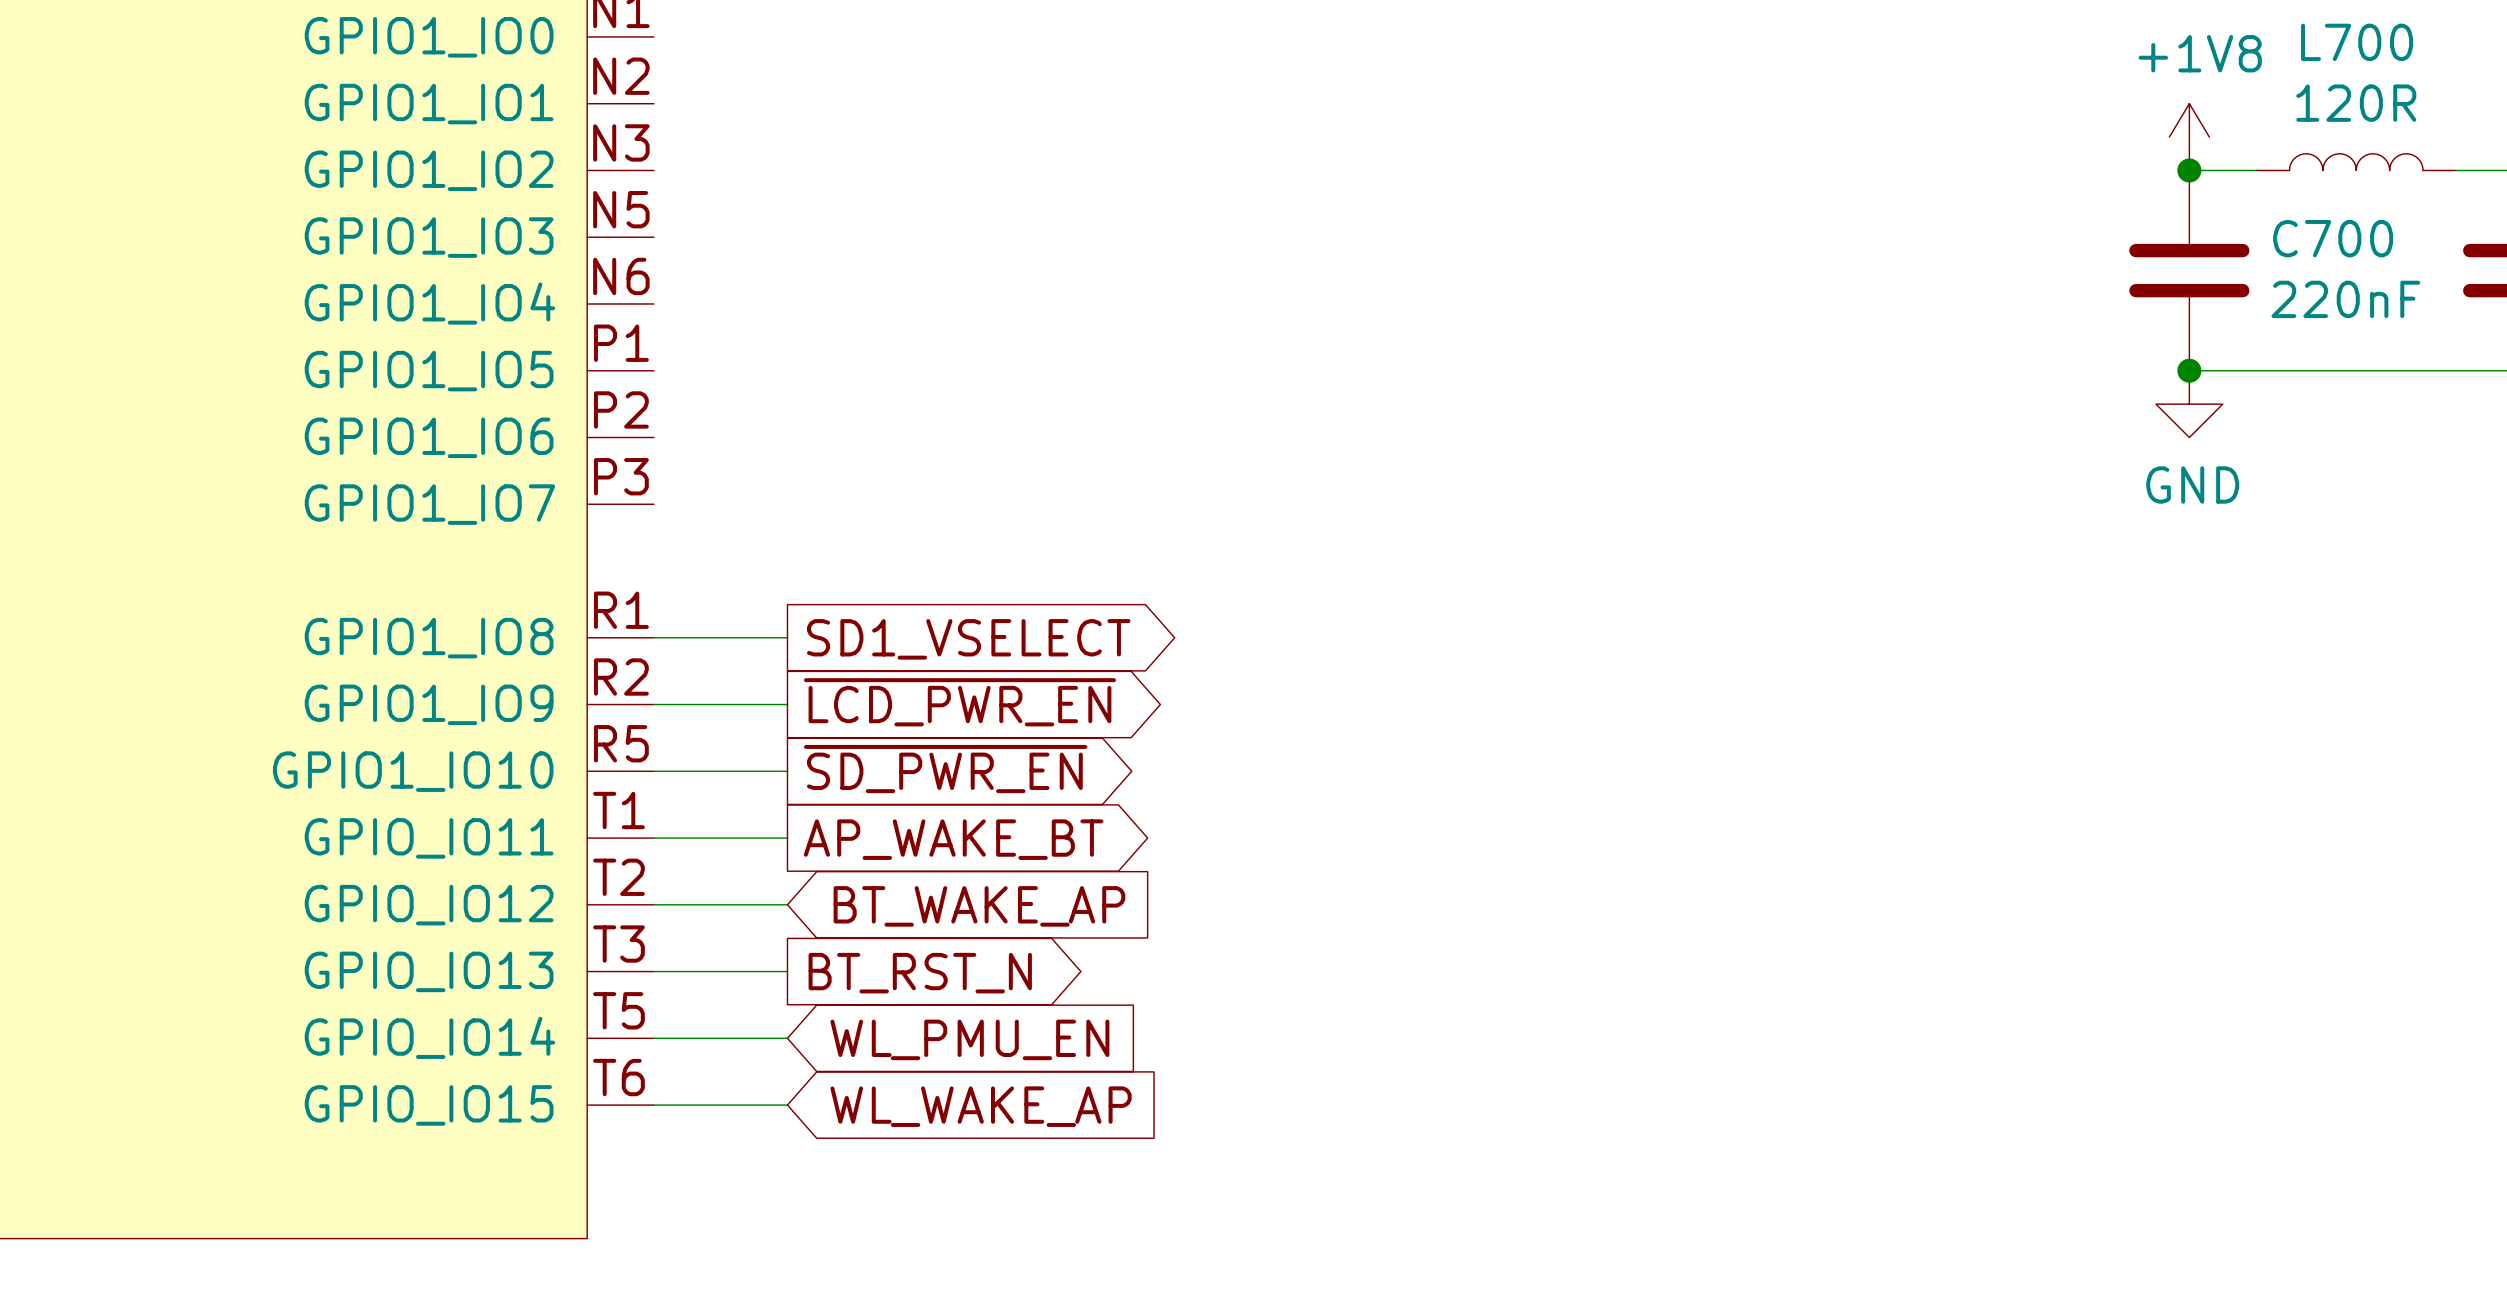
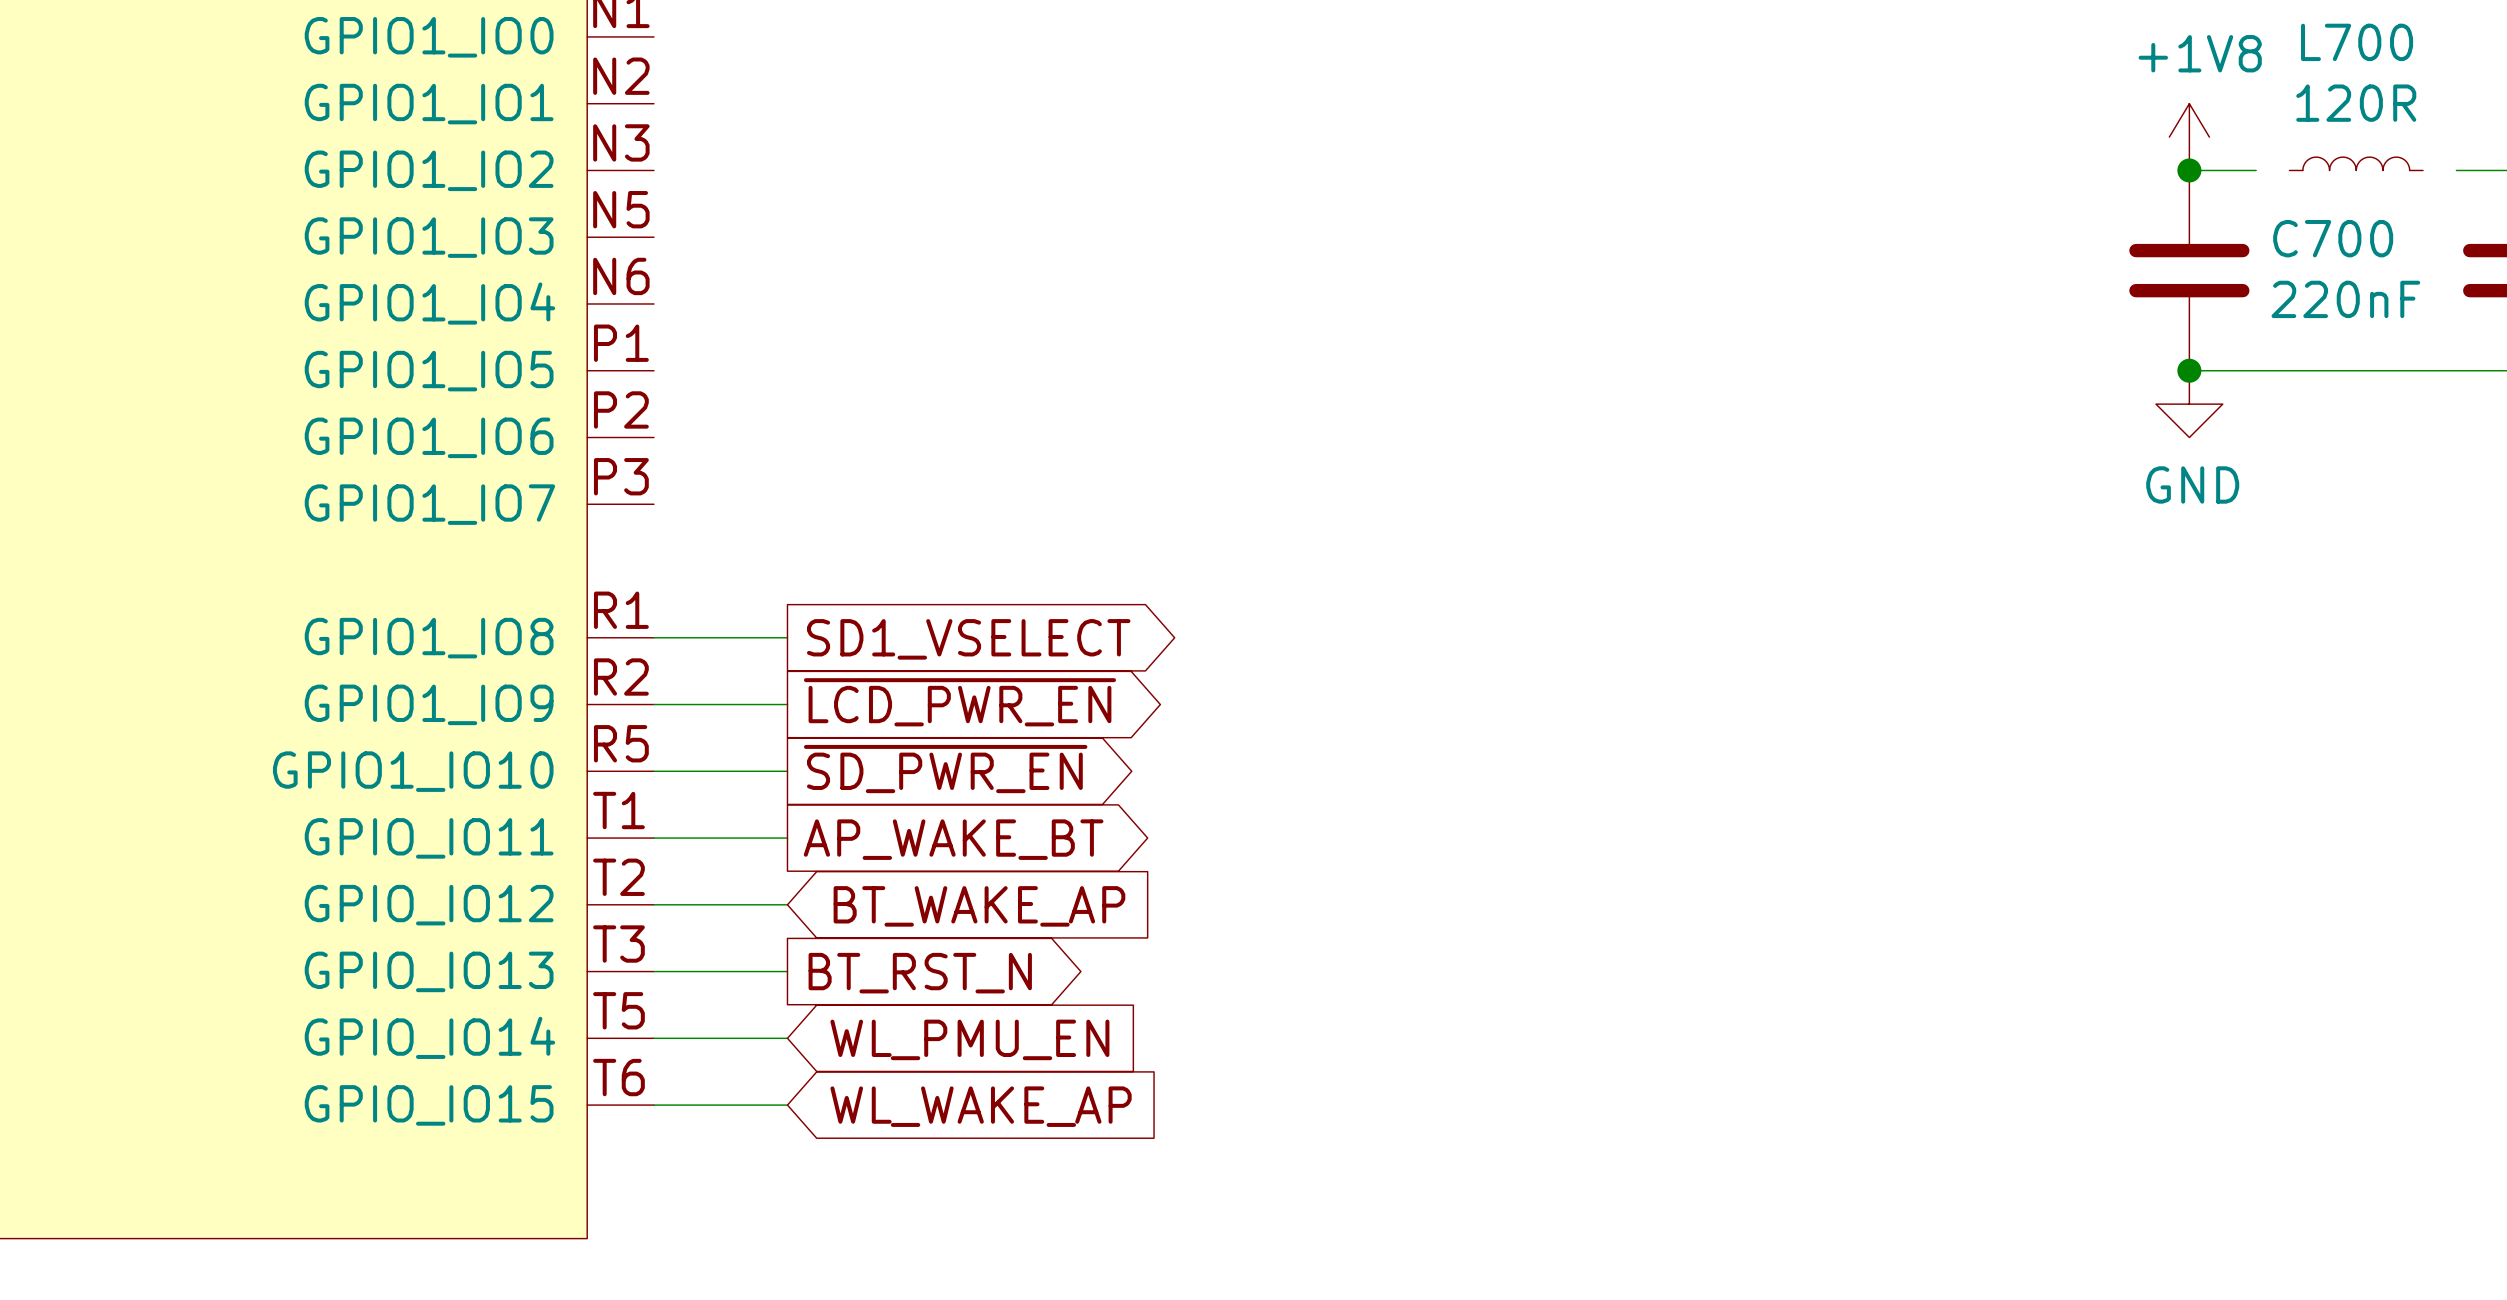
L700 symbol: [2256, 153, 2457, 171] -> [2289, 157, 2424, 171]

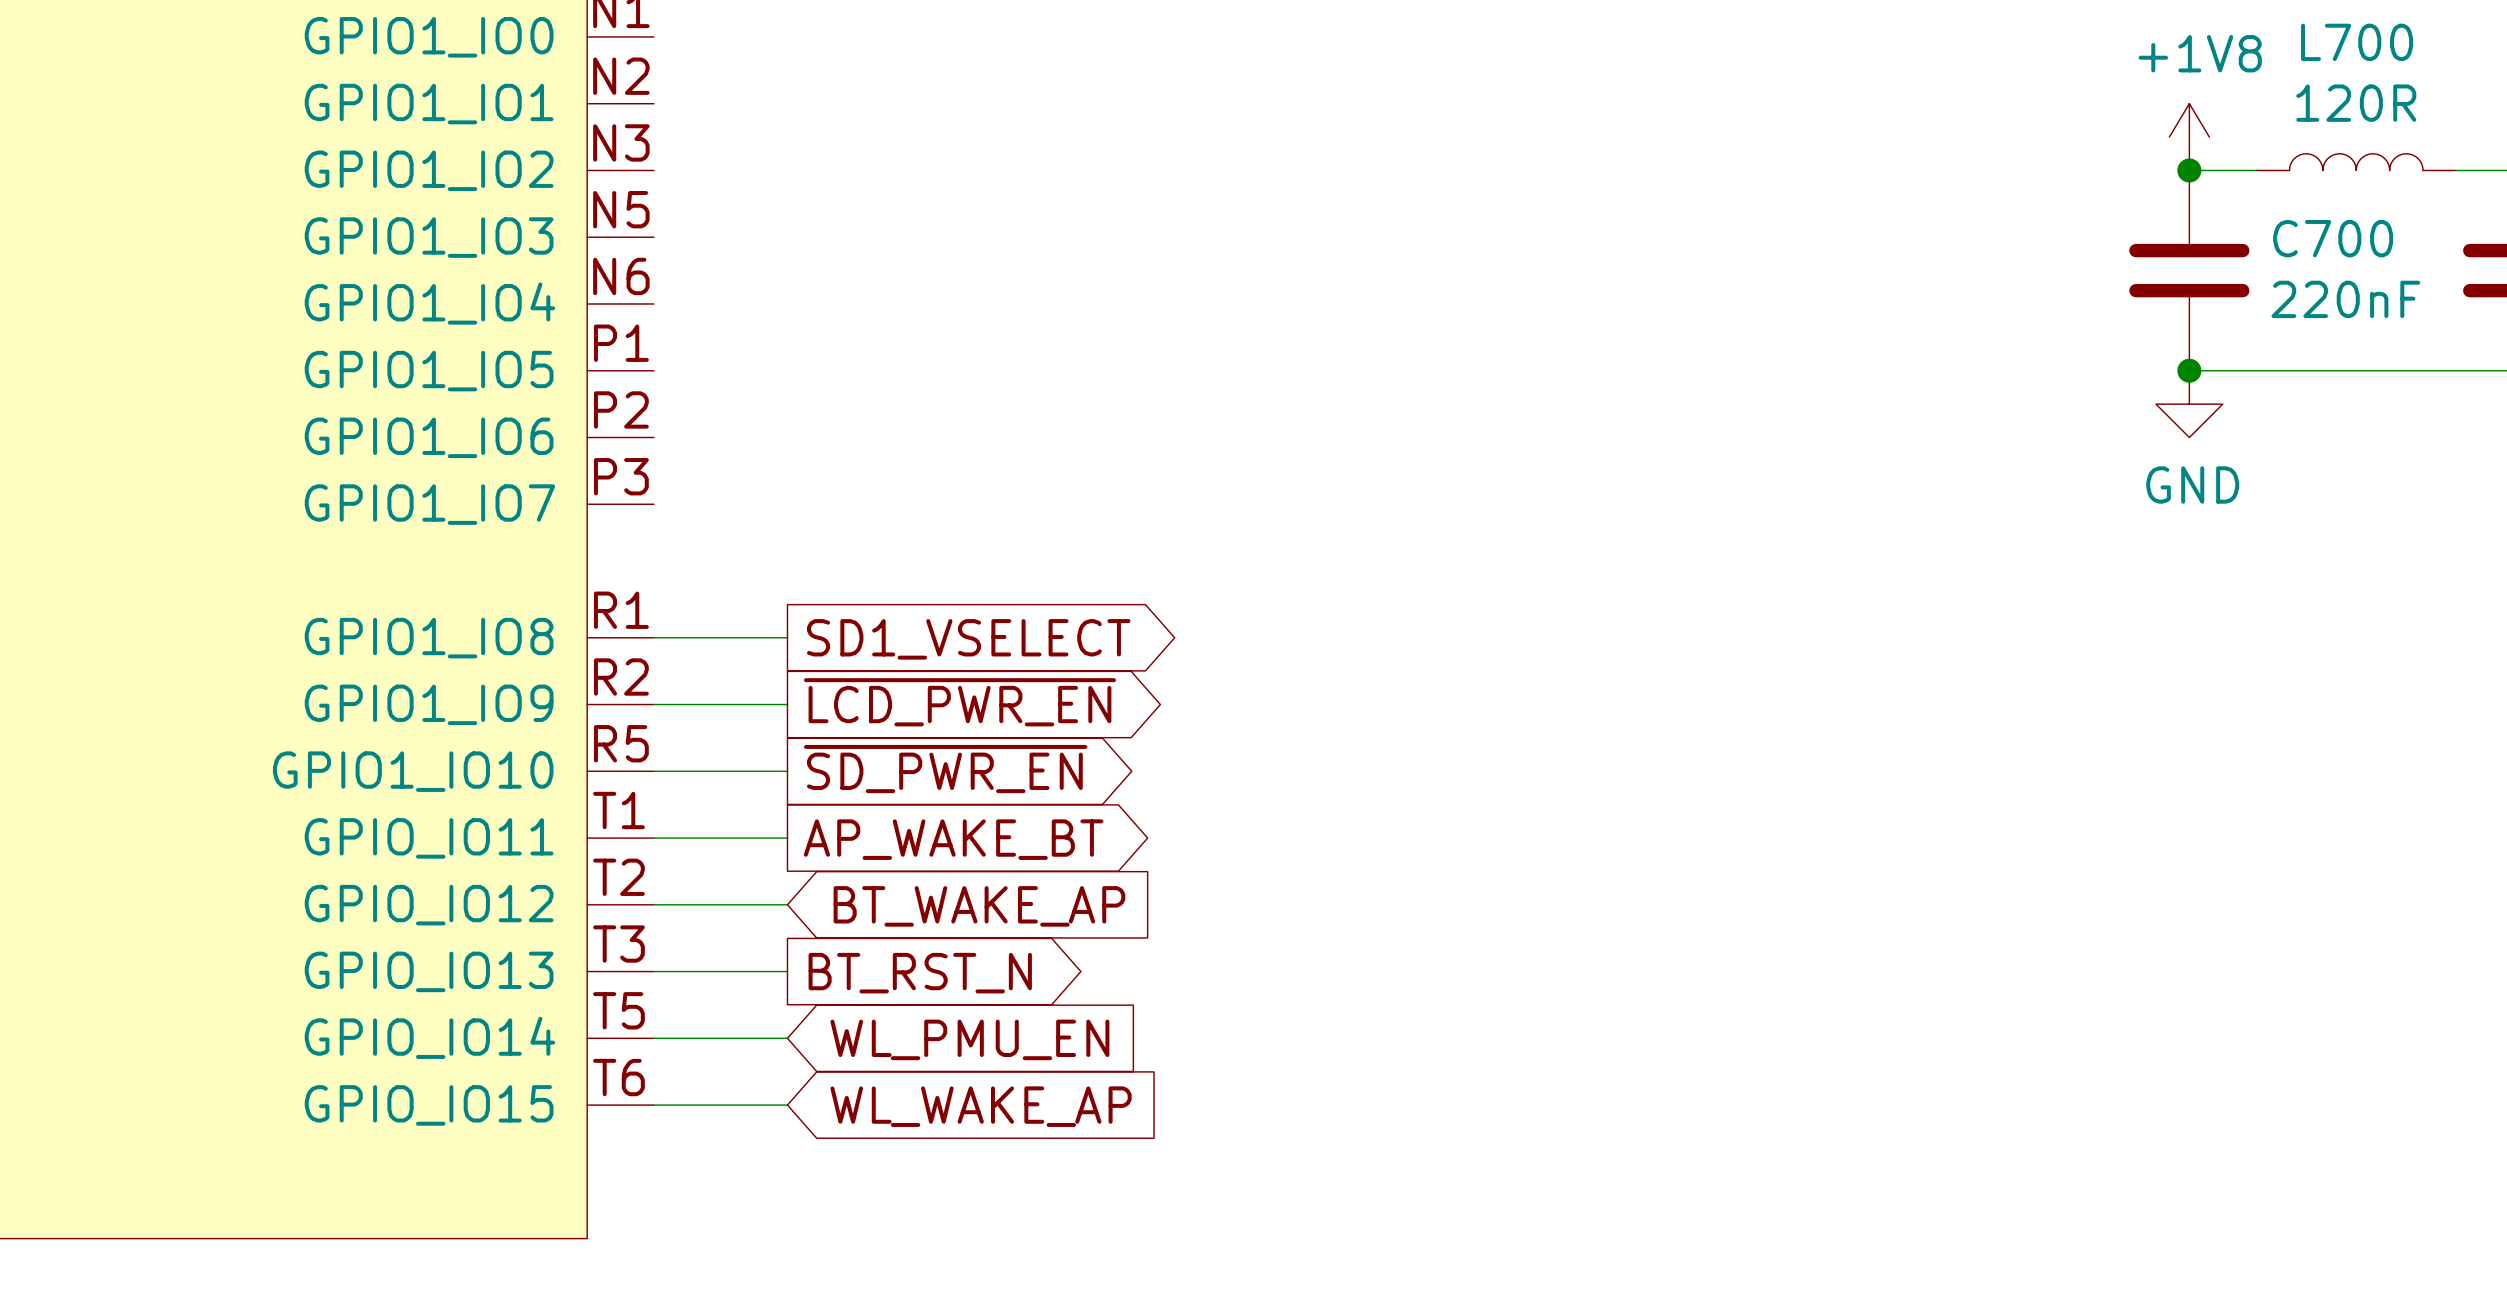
L700 symbol: [2289, 157, 2424, 171] -> [2256, 153, 2457, 171]

